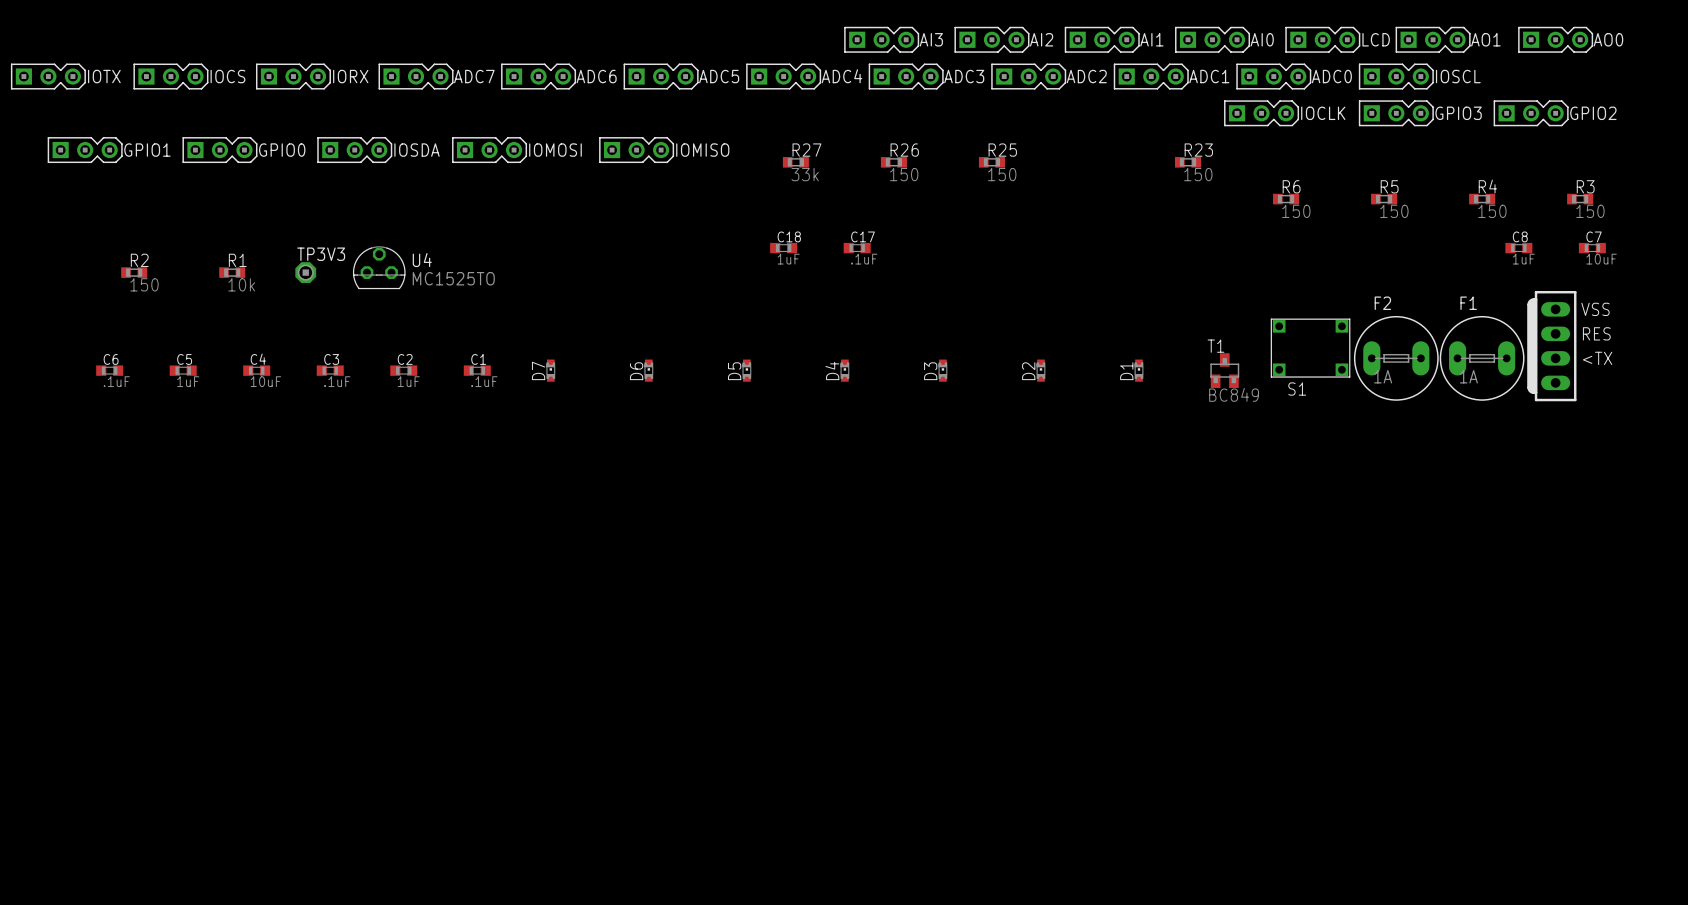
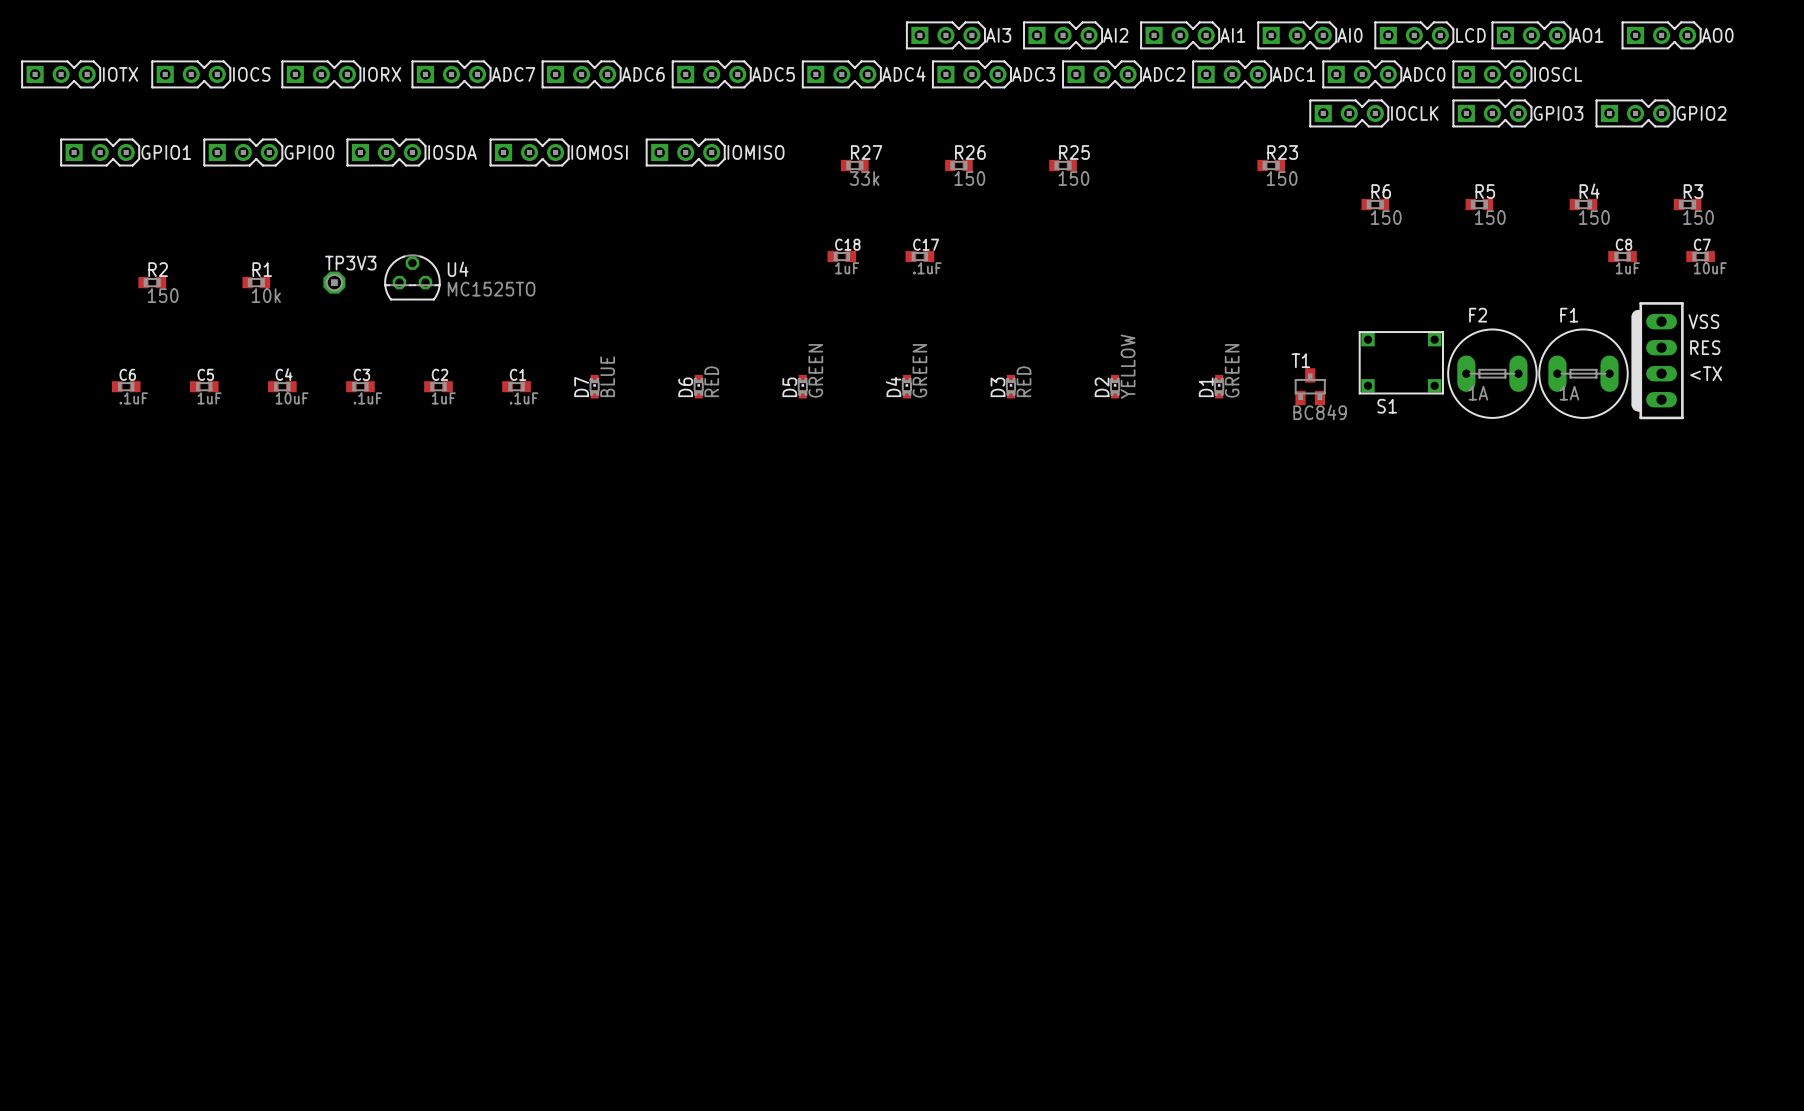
D2 value: none -> YELLOW (1128, 366)
D5 value: none -> GREEN (815, 370)
D4 value: none -> GREEN (919, 370)
D1 value: none -> GREEN (1232, 370)
D7 value: none -> BLUE (607, 376)
D6 value: none -> RED (711, 381)
D3 value: none -> RED (1024, 381)

